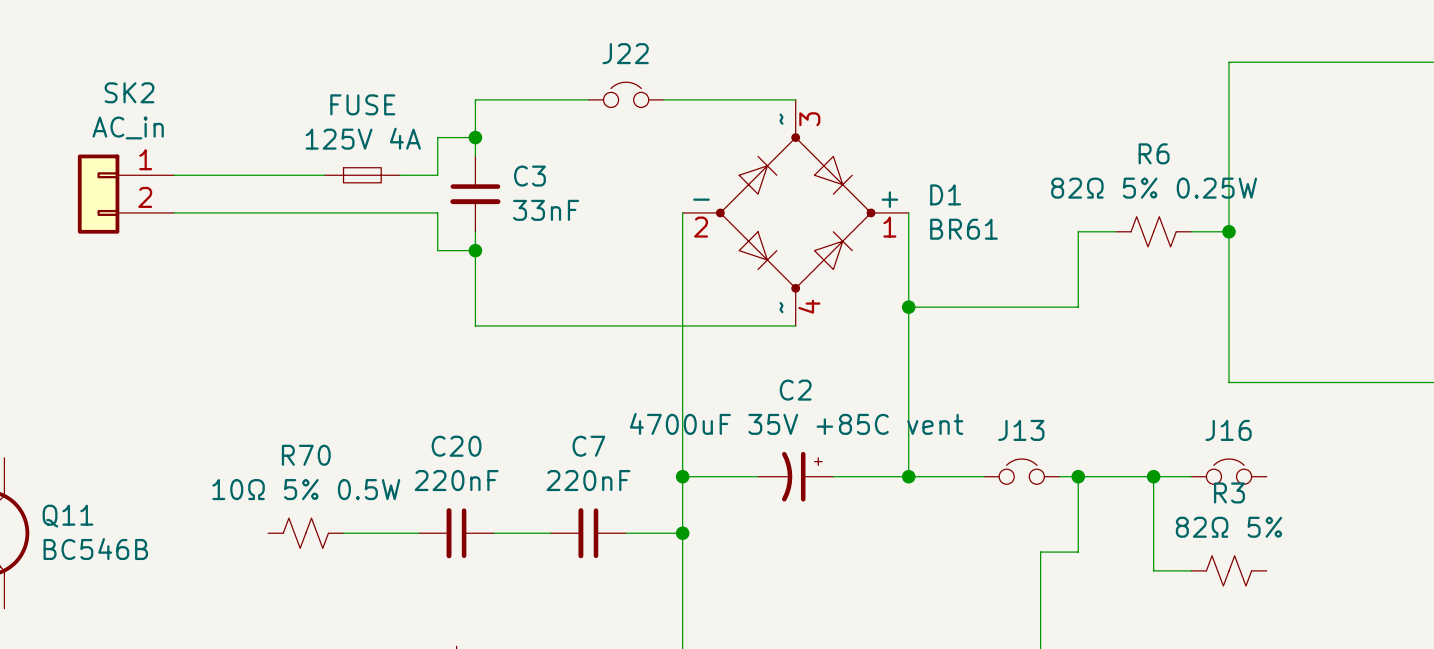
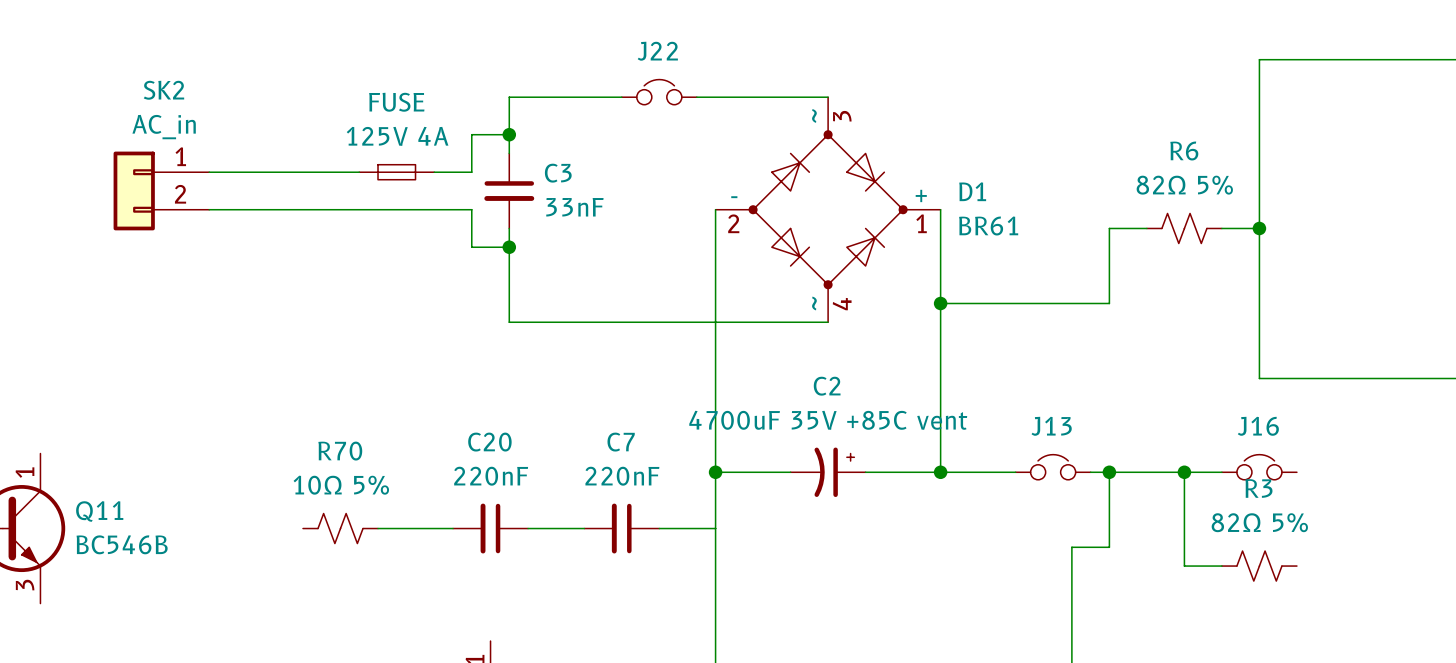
R6 value: 82Ω 5% 0.25W (1154, 188) -> 82Ω 5% (1184, 185)
R70 value: 10Ω 5% 0.5W (306, 489) -> 10Ω 5% (341, 485)
junction: (682, 533) -> none

